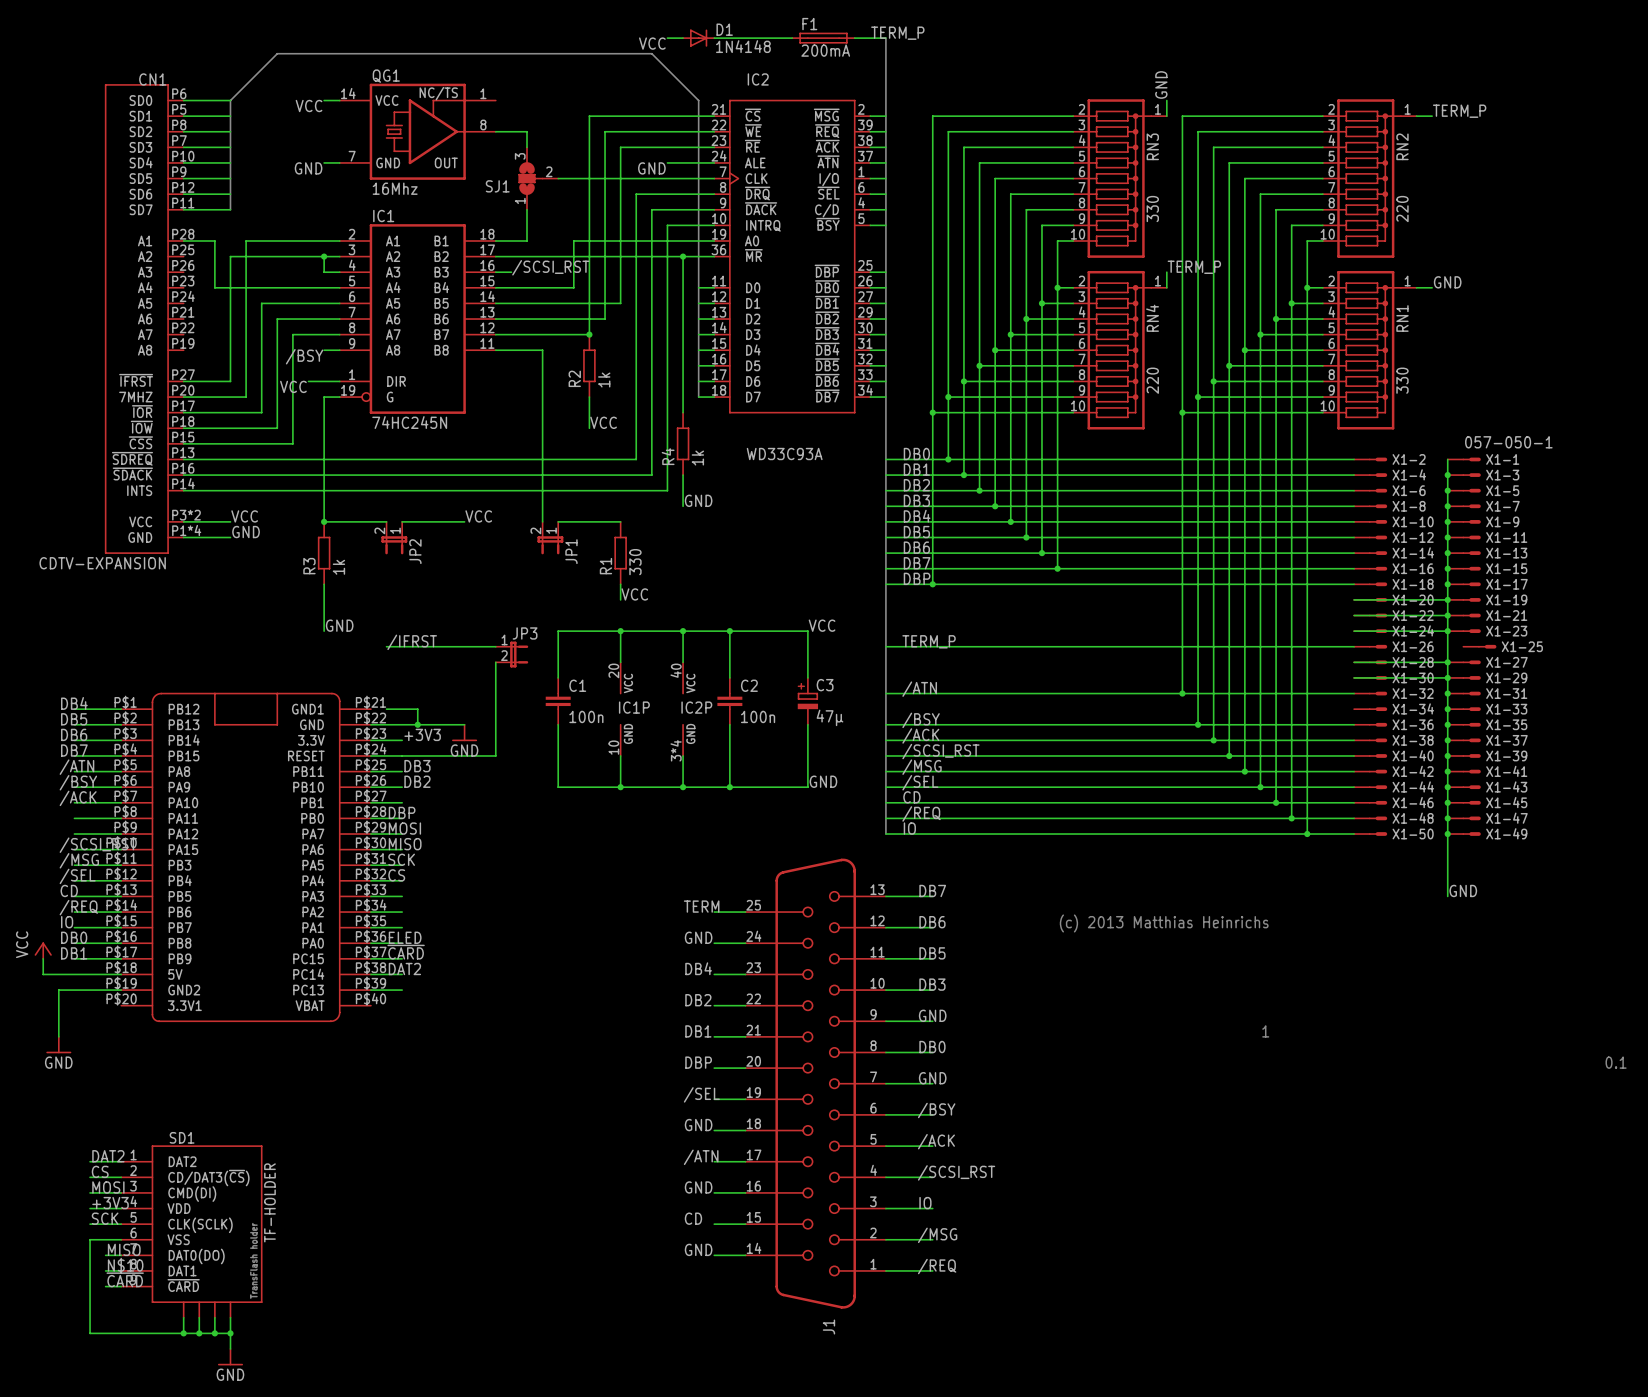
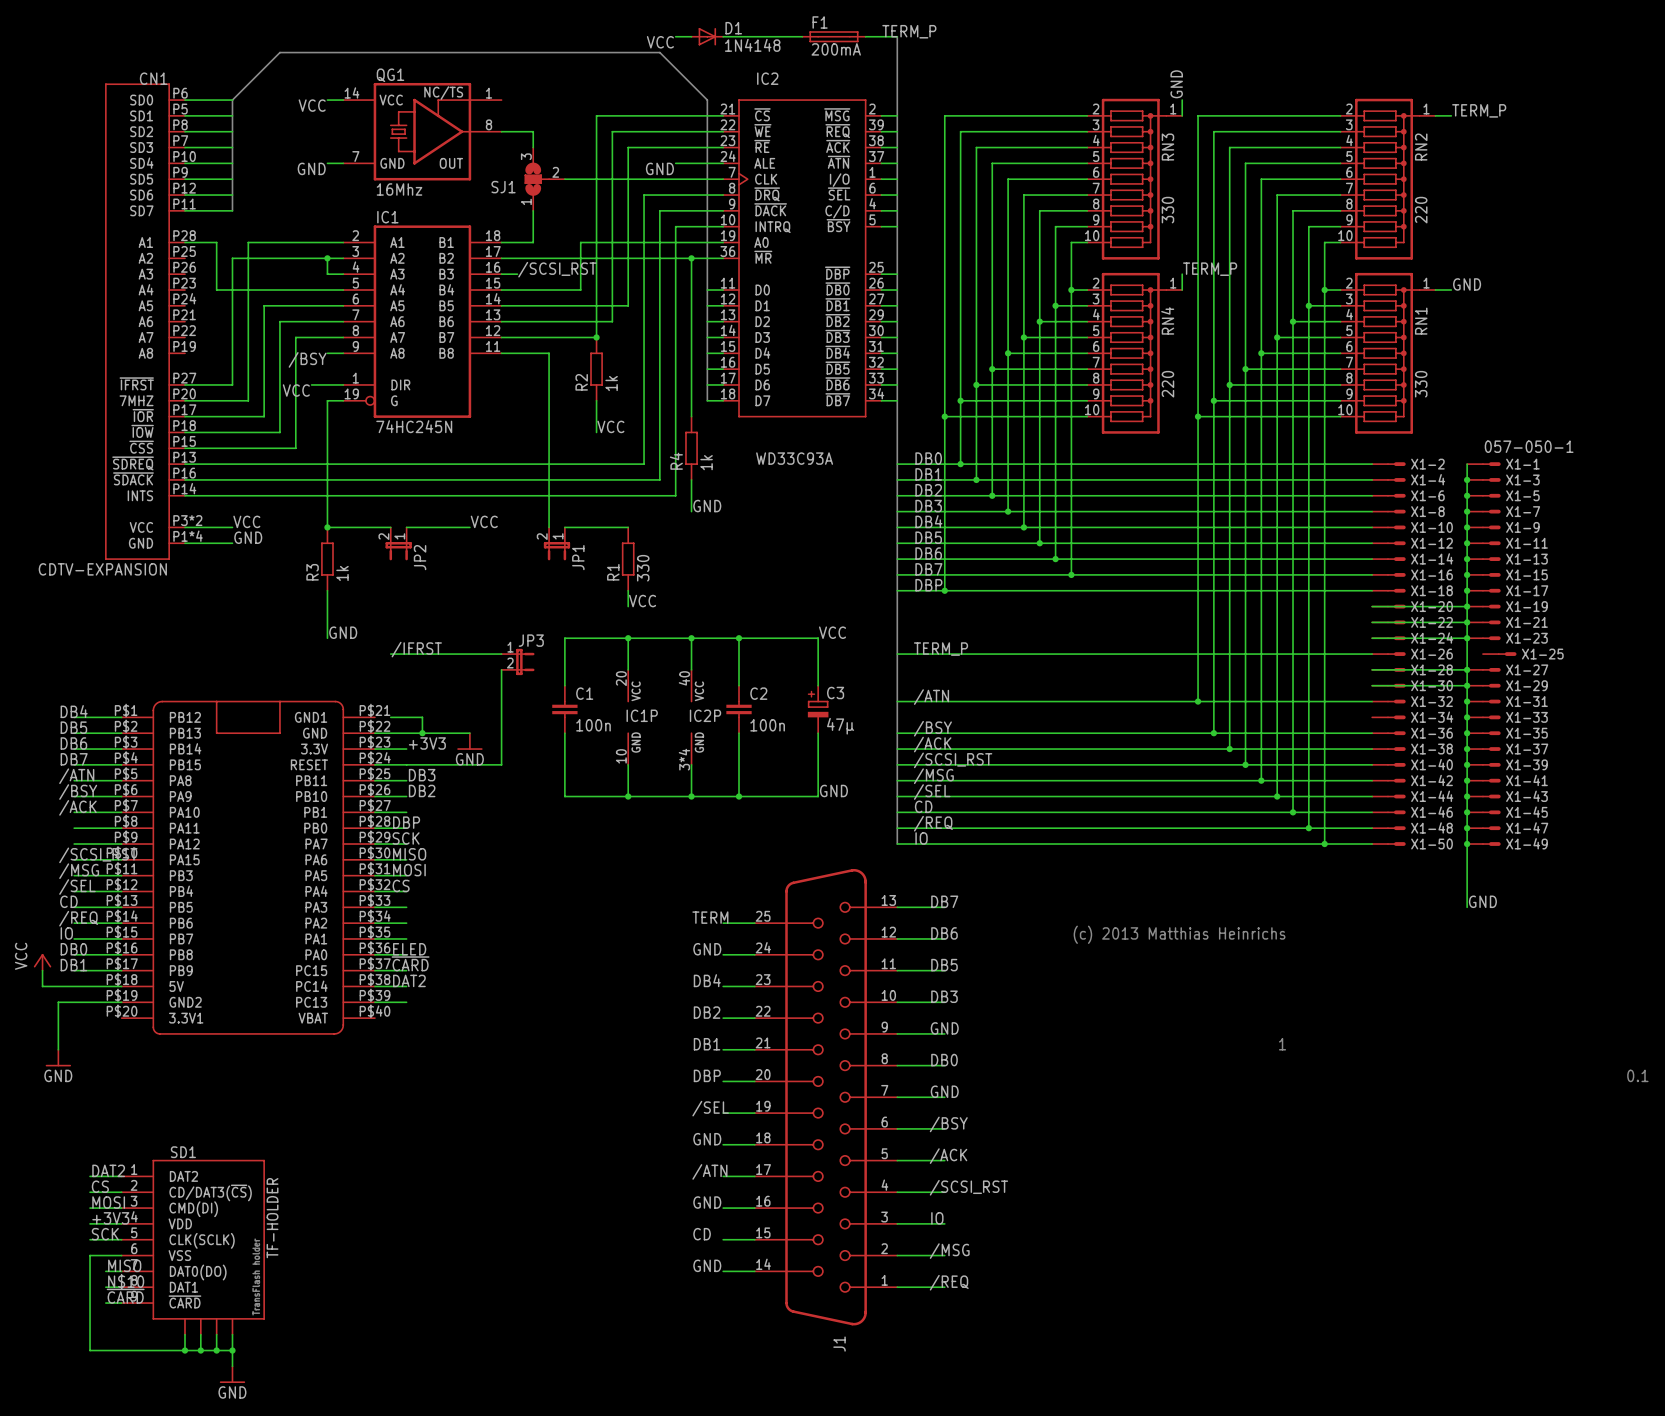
label: MOSI (404, 828) -> SCK (406, 838)
label: SCK (401, 859) -> MOSI (409, 870)

